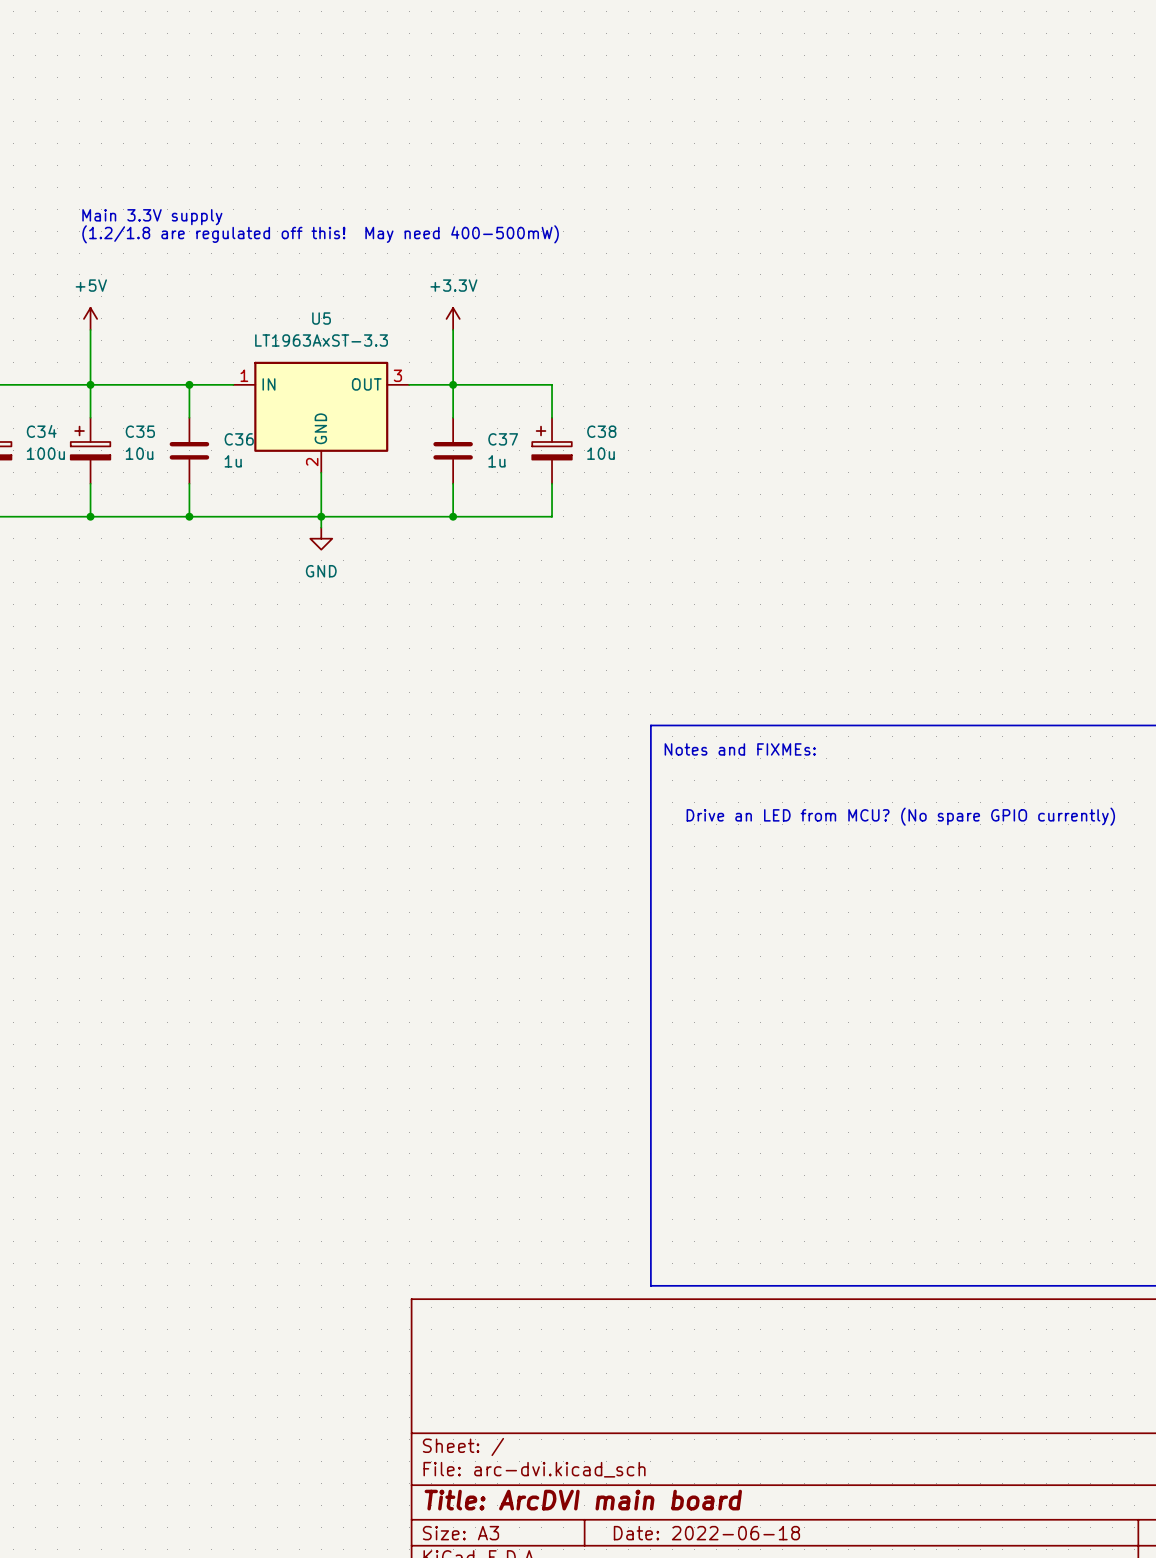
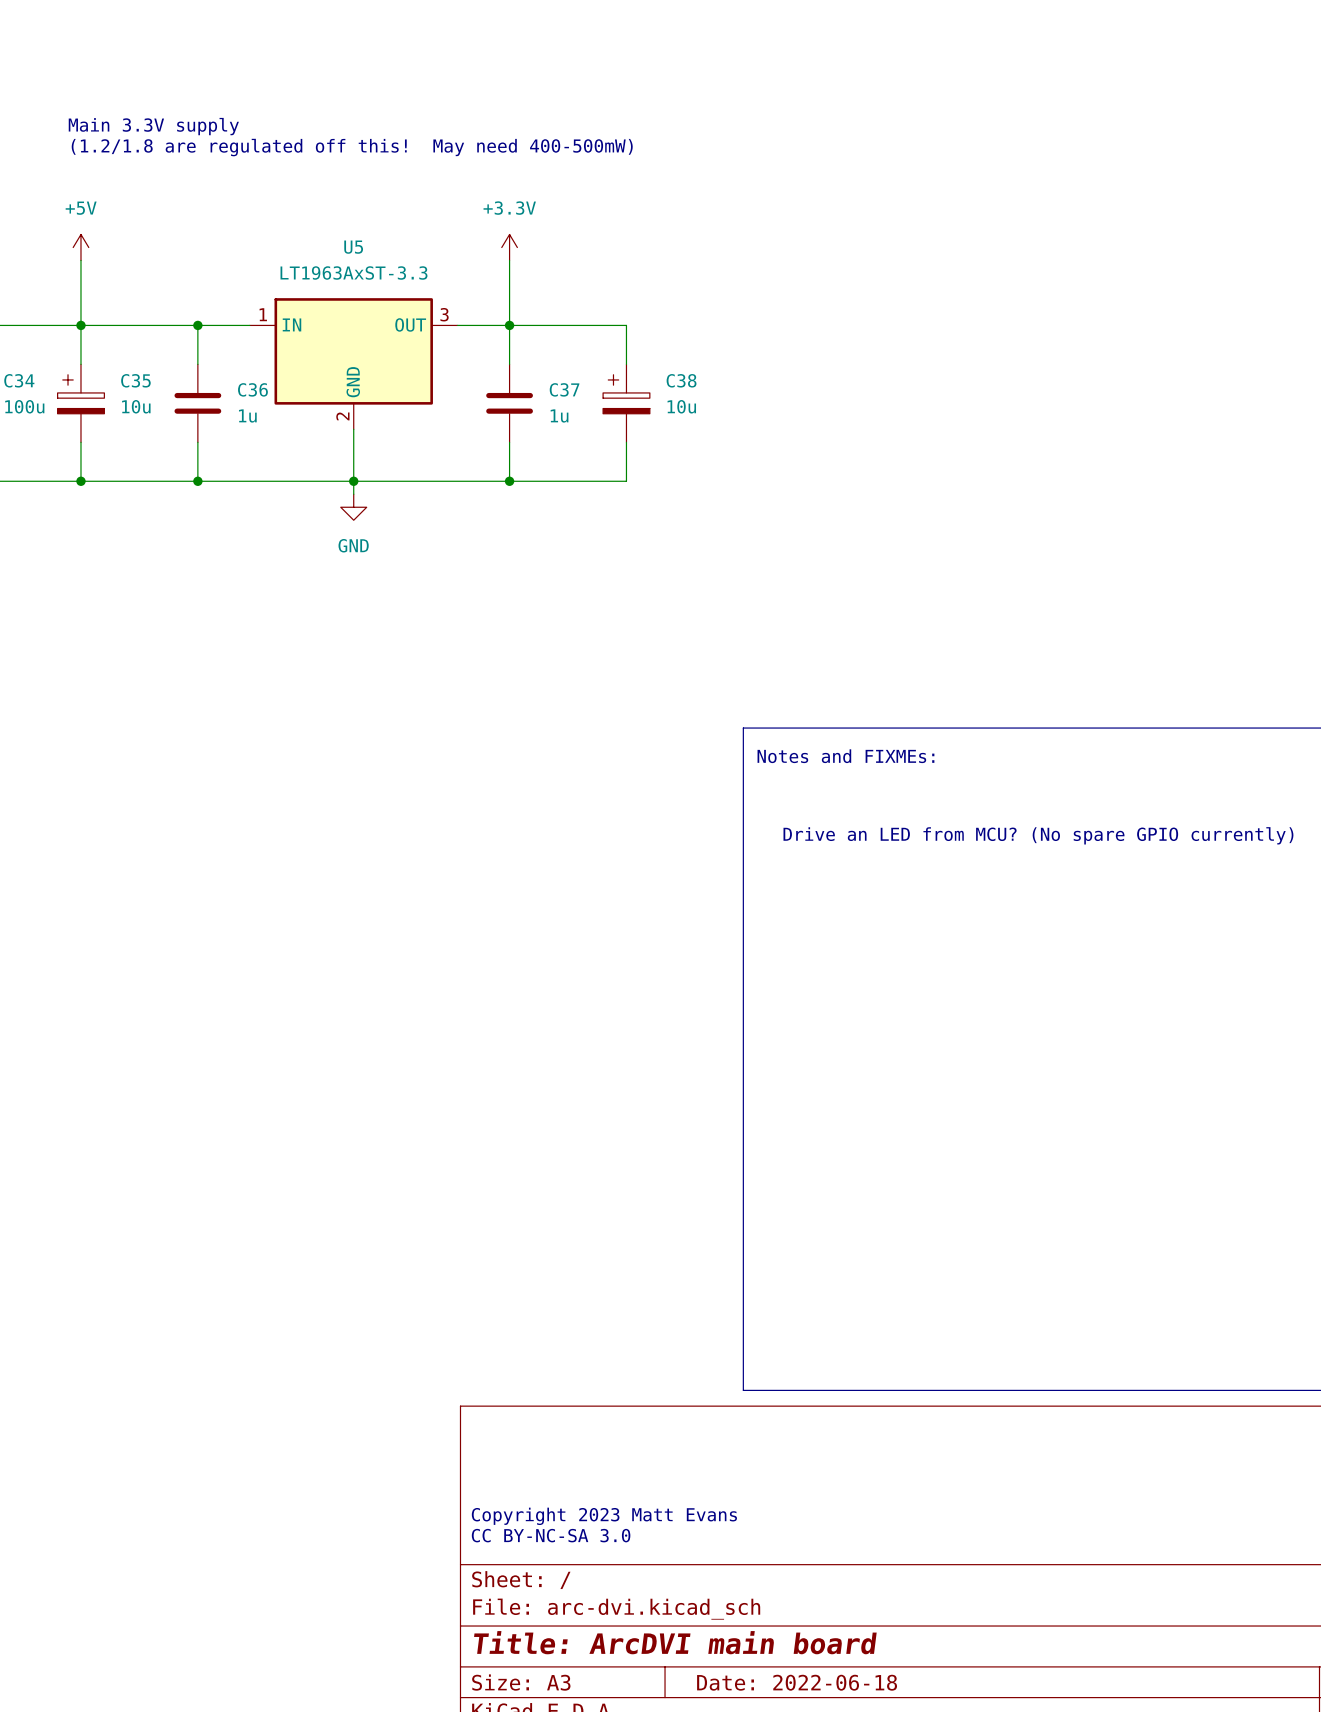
text: none -> Copyright 2023 Matt Evans (604, 1516)
text: none -> CC BY-NC-SA 3.0 (551, 1535)

